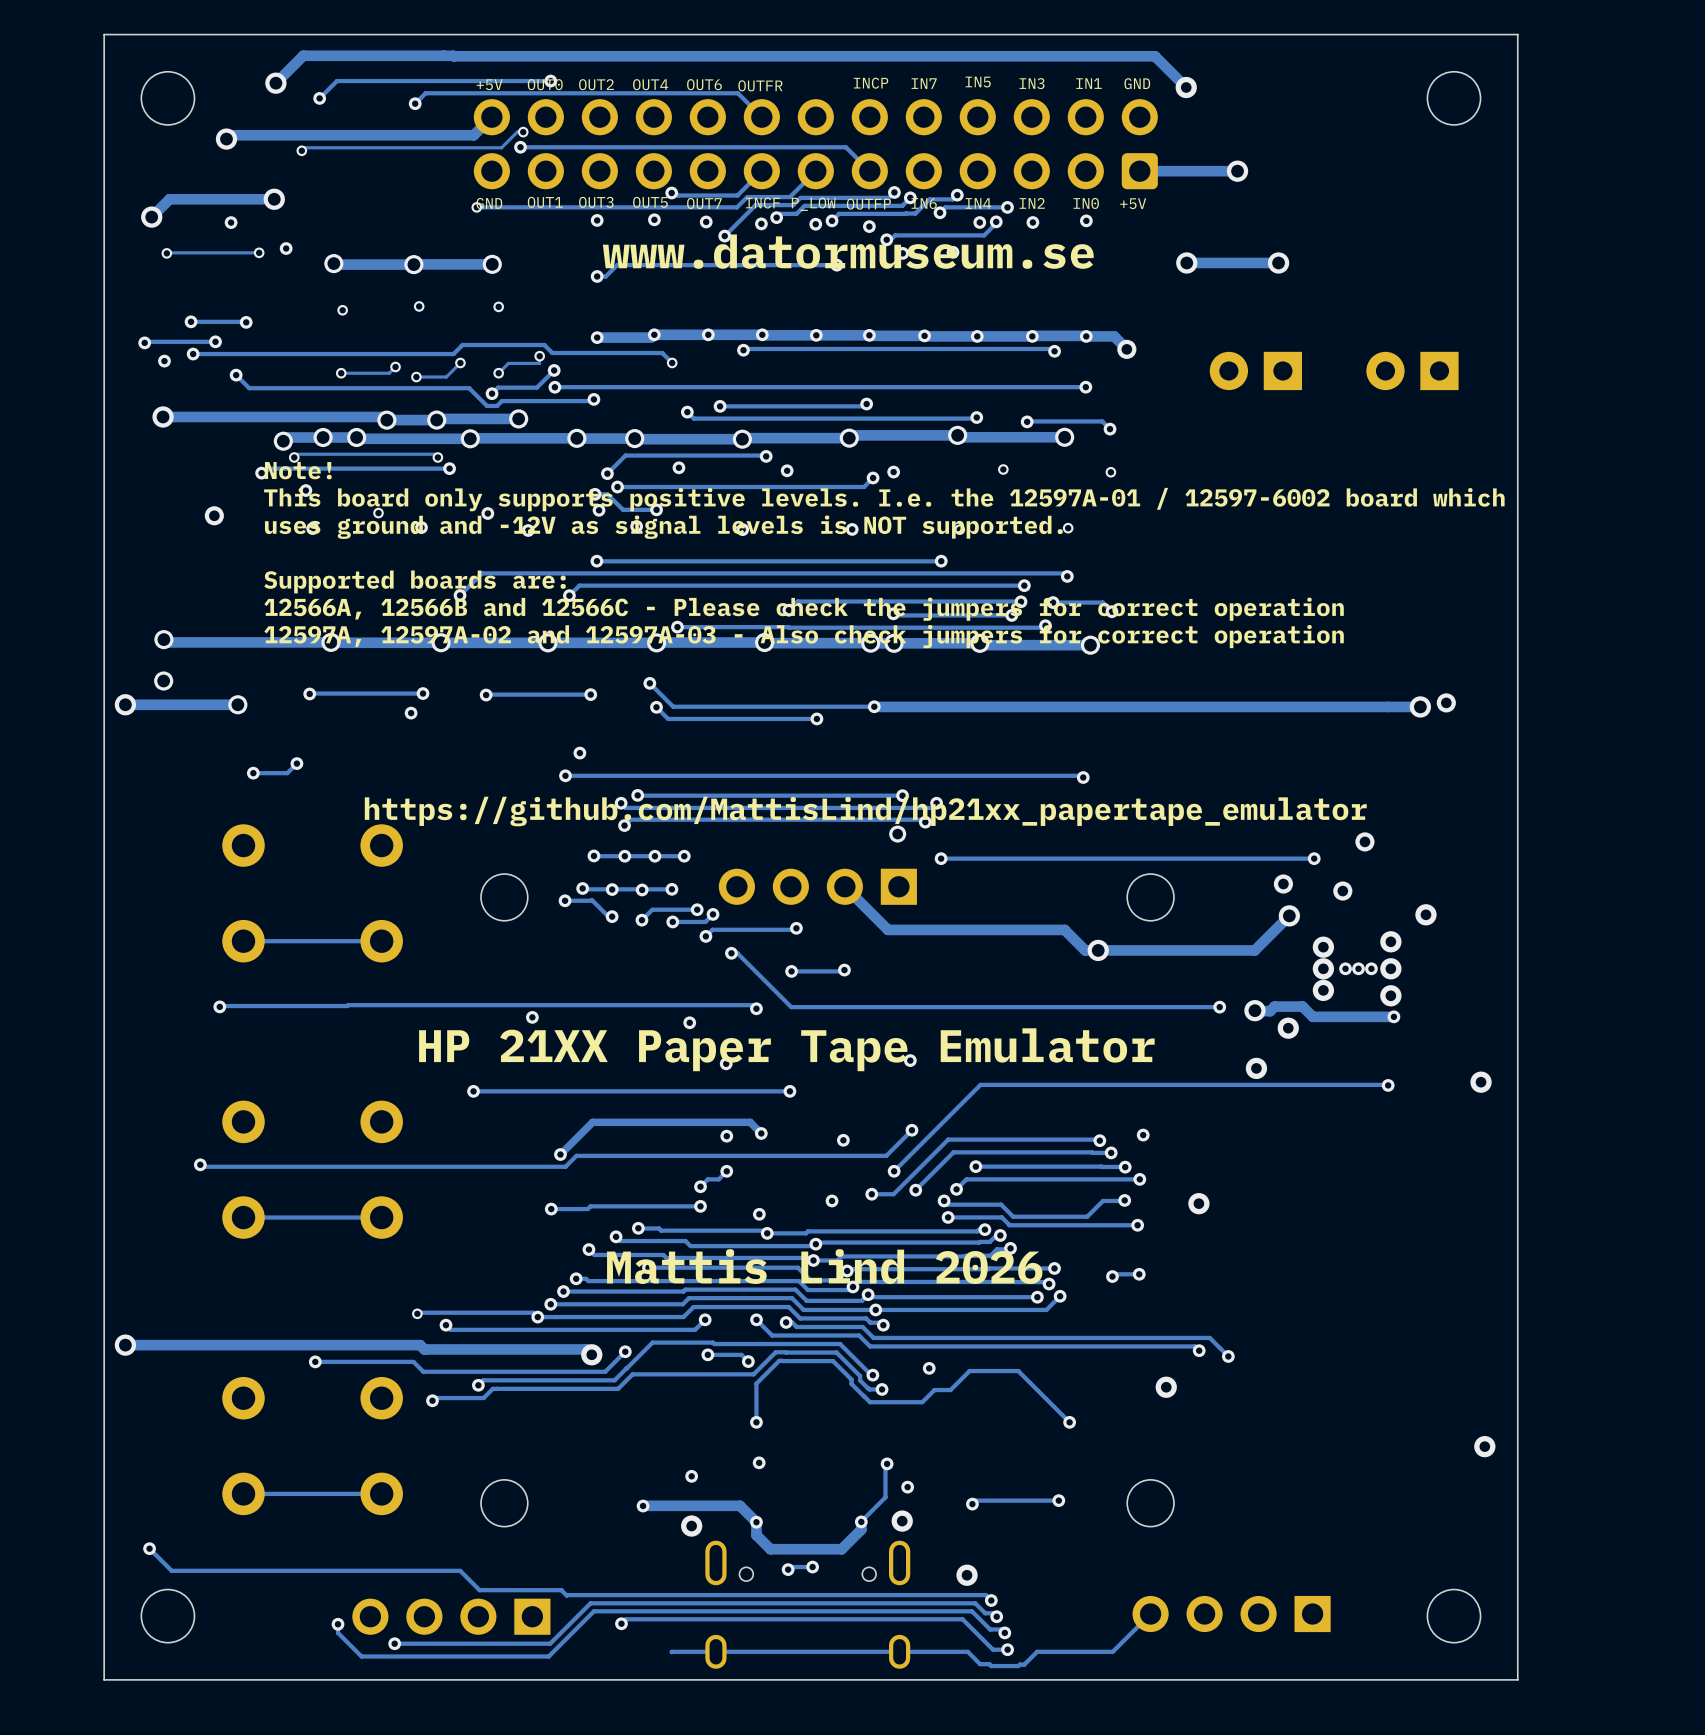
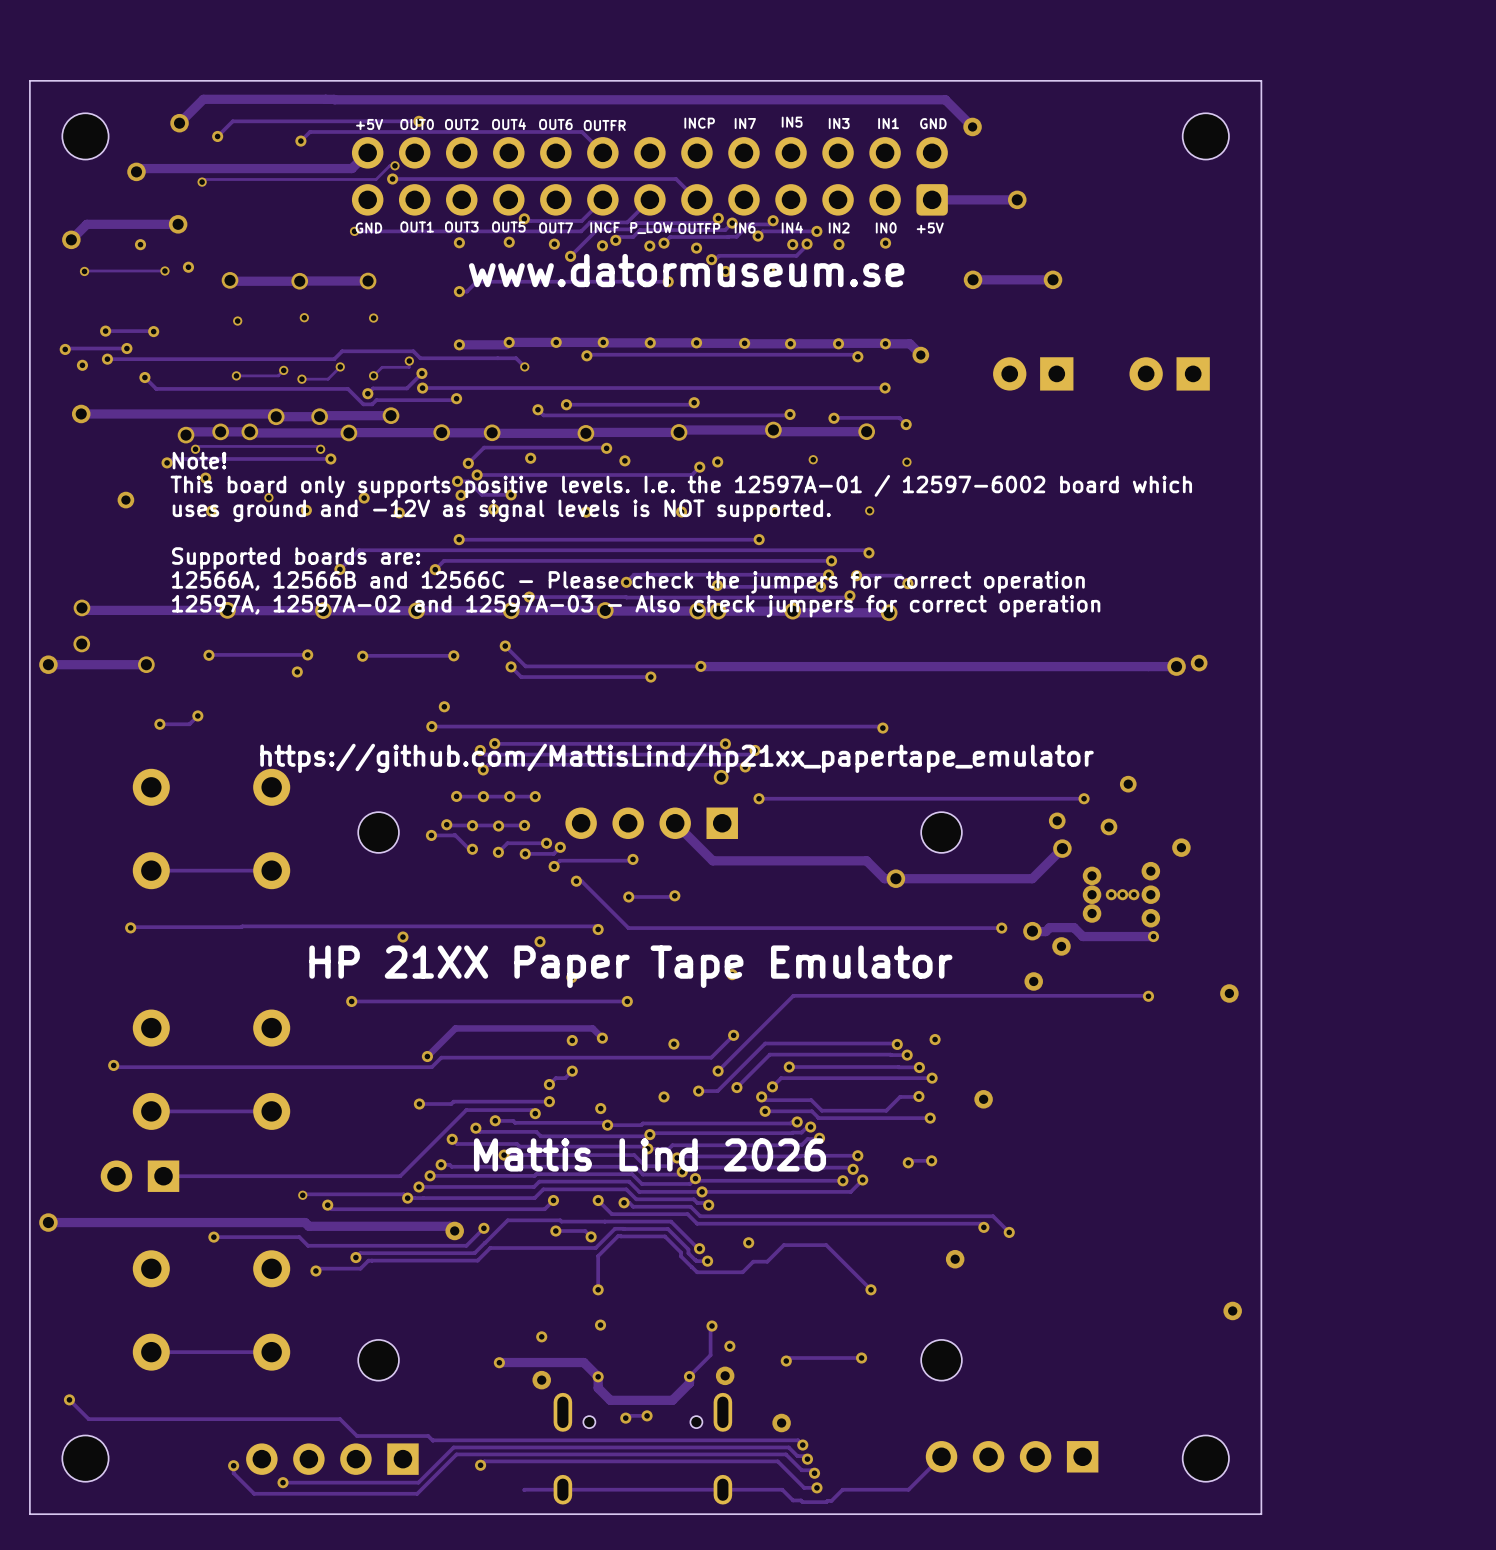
track: none -> (535, 1113) (531, 1110) (466, 1110) (400, 1176) (163, 1176)
via: none -> (535, 1113)
part: none -> (140, 1176)

